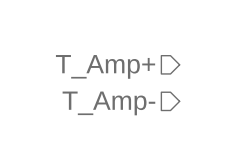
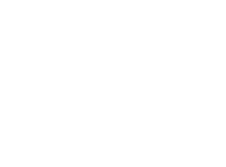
hierarchical label: T_Amp+ (105, 66) -> none
hierarchical label: T_Amp- (108, 103) -> none

